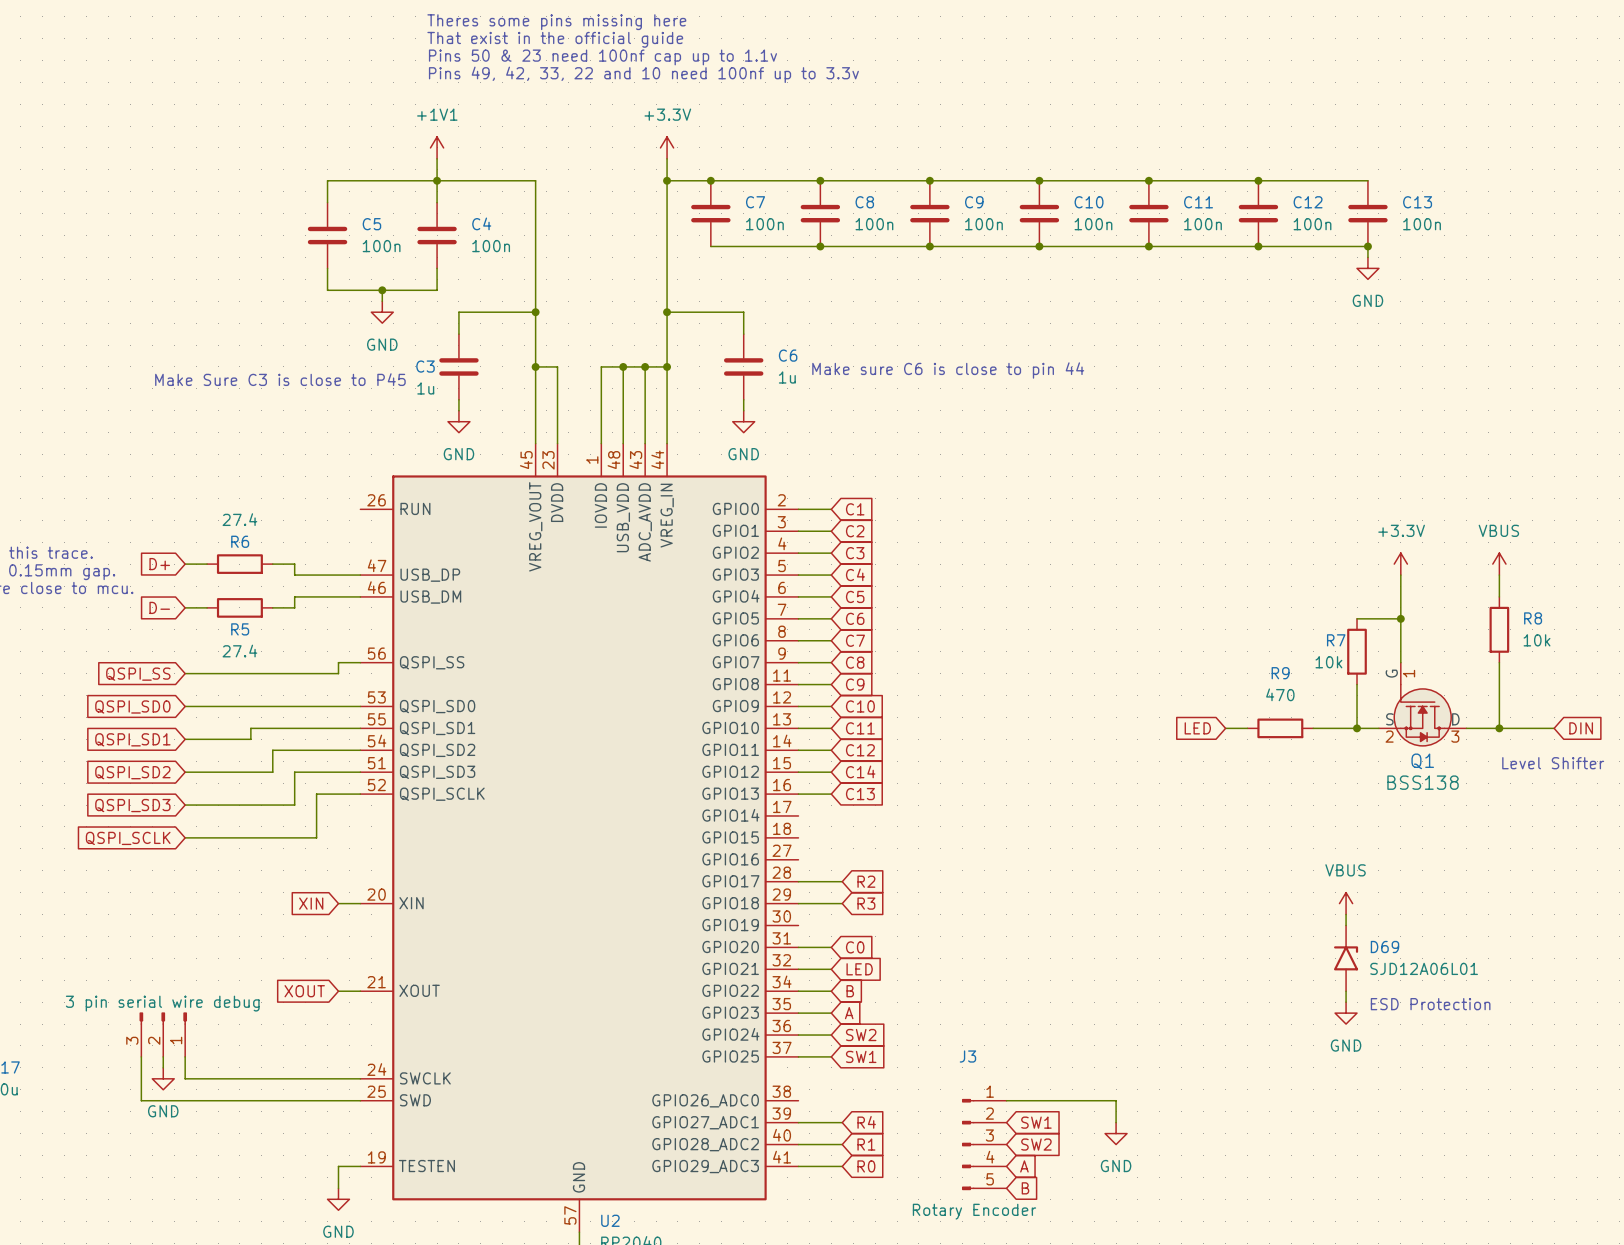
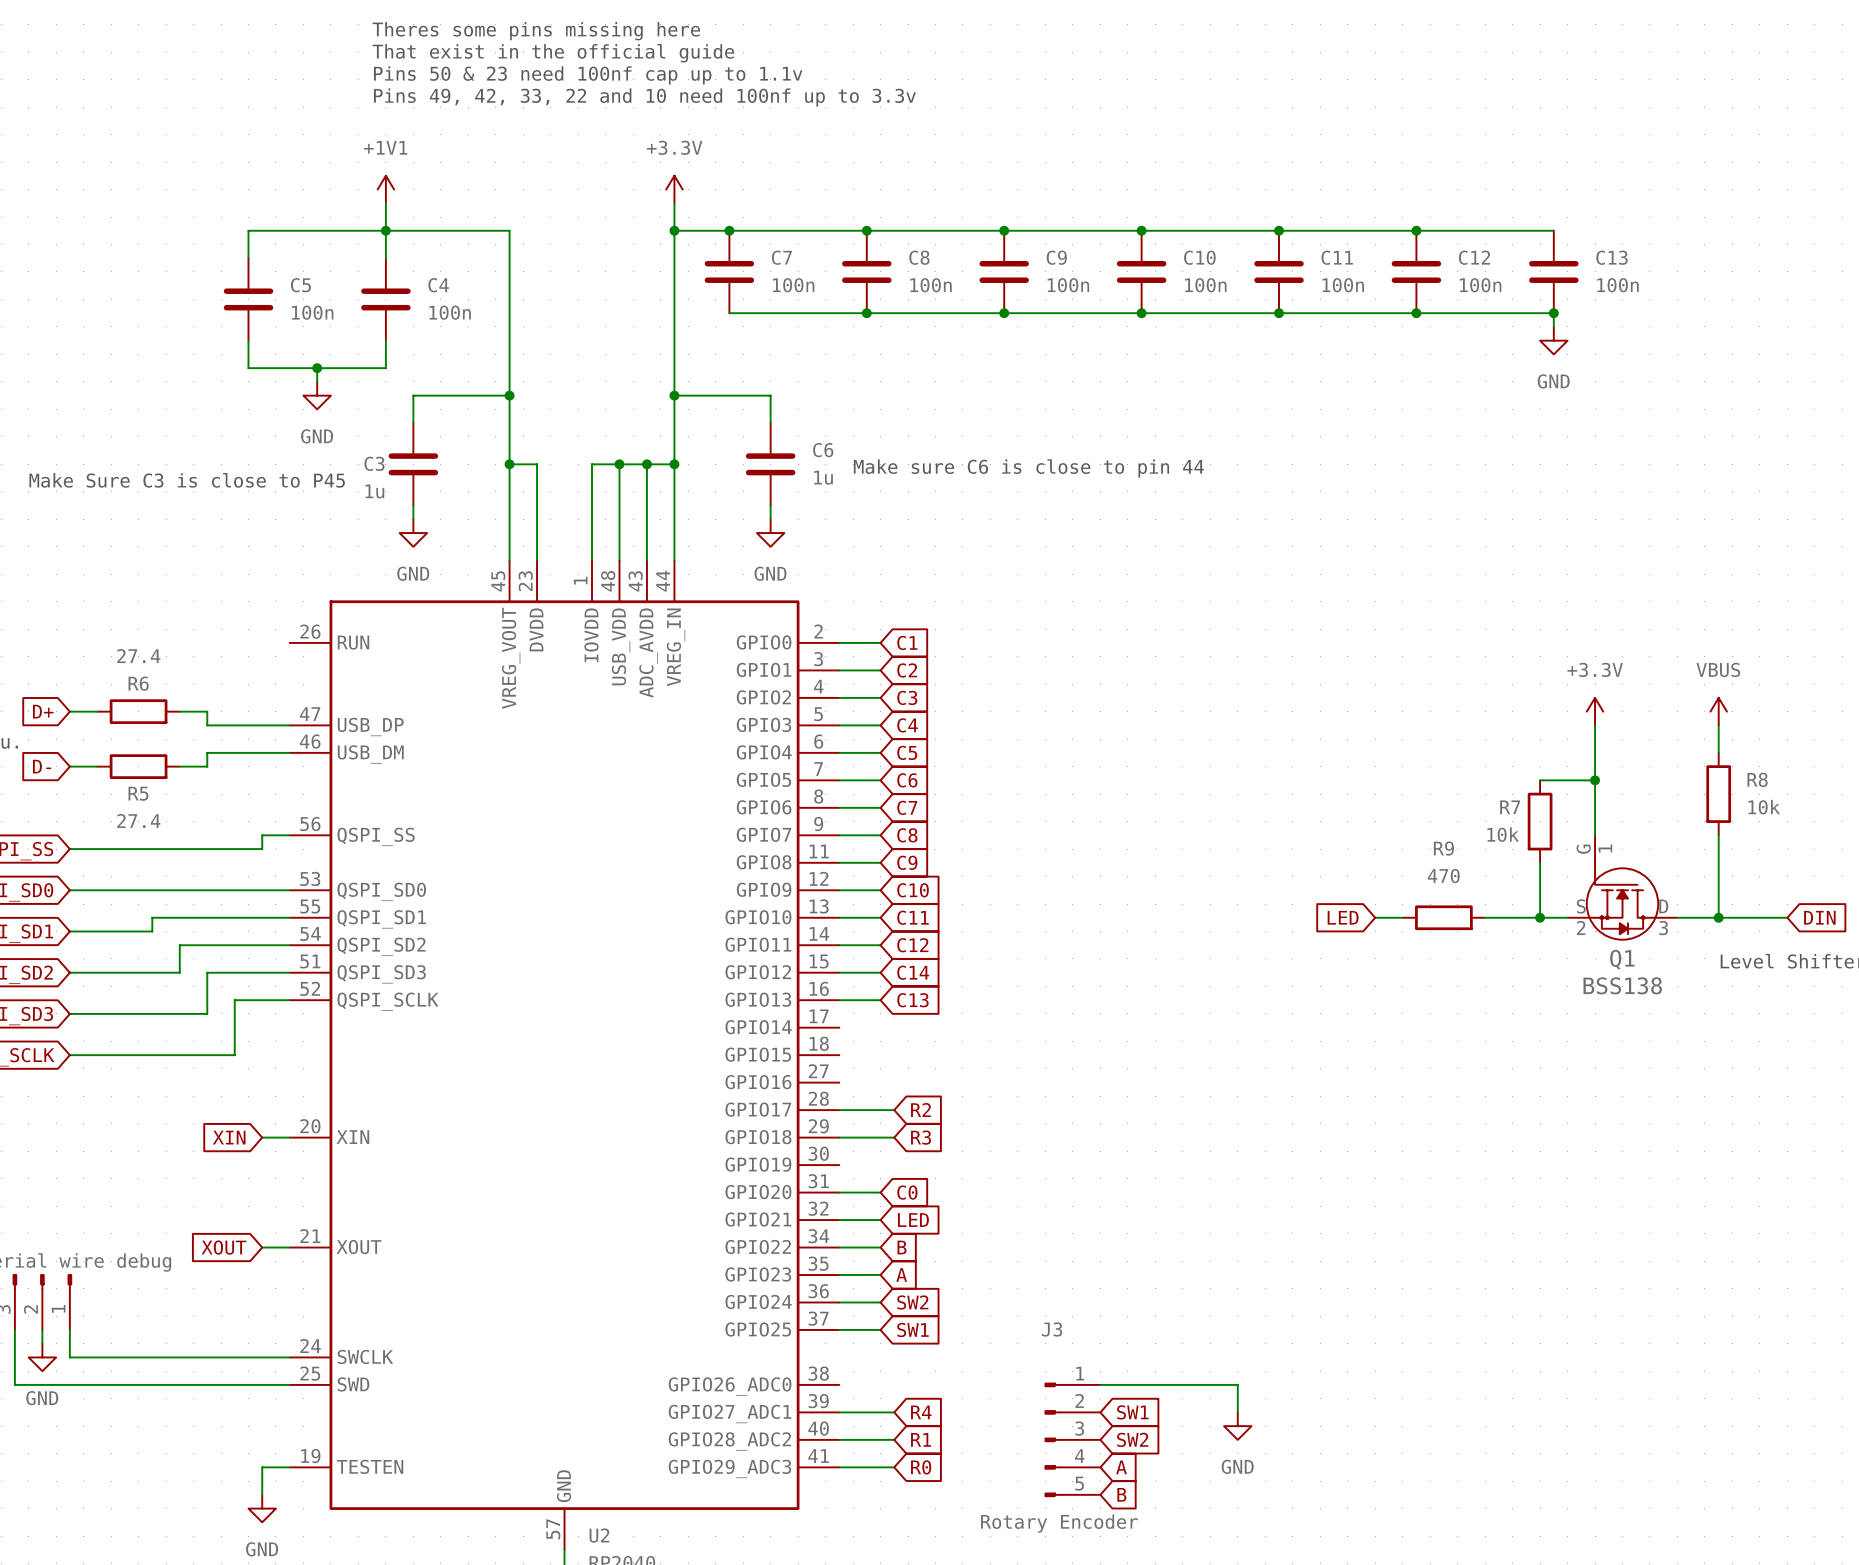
power symbol: VBUS (1346, 903) -> none
wire: (1346, 914) (1346, 925) -> none
D69: SJD12A06L01 (1346, 958) -> none
wire: (1346, 991) (1346, 1002) -> none
text: ESD Protection (1430, 1004) -> none
power symbol: GND (1346, 1013) -> none

